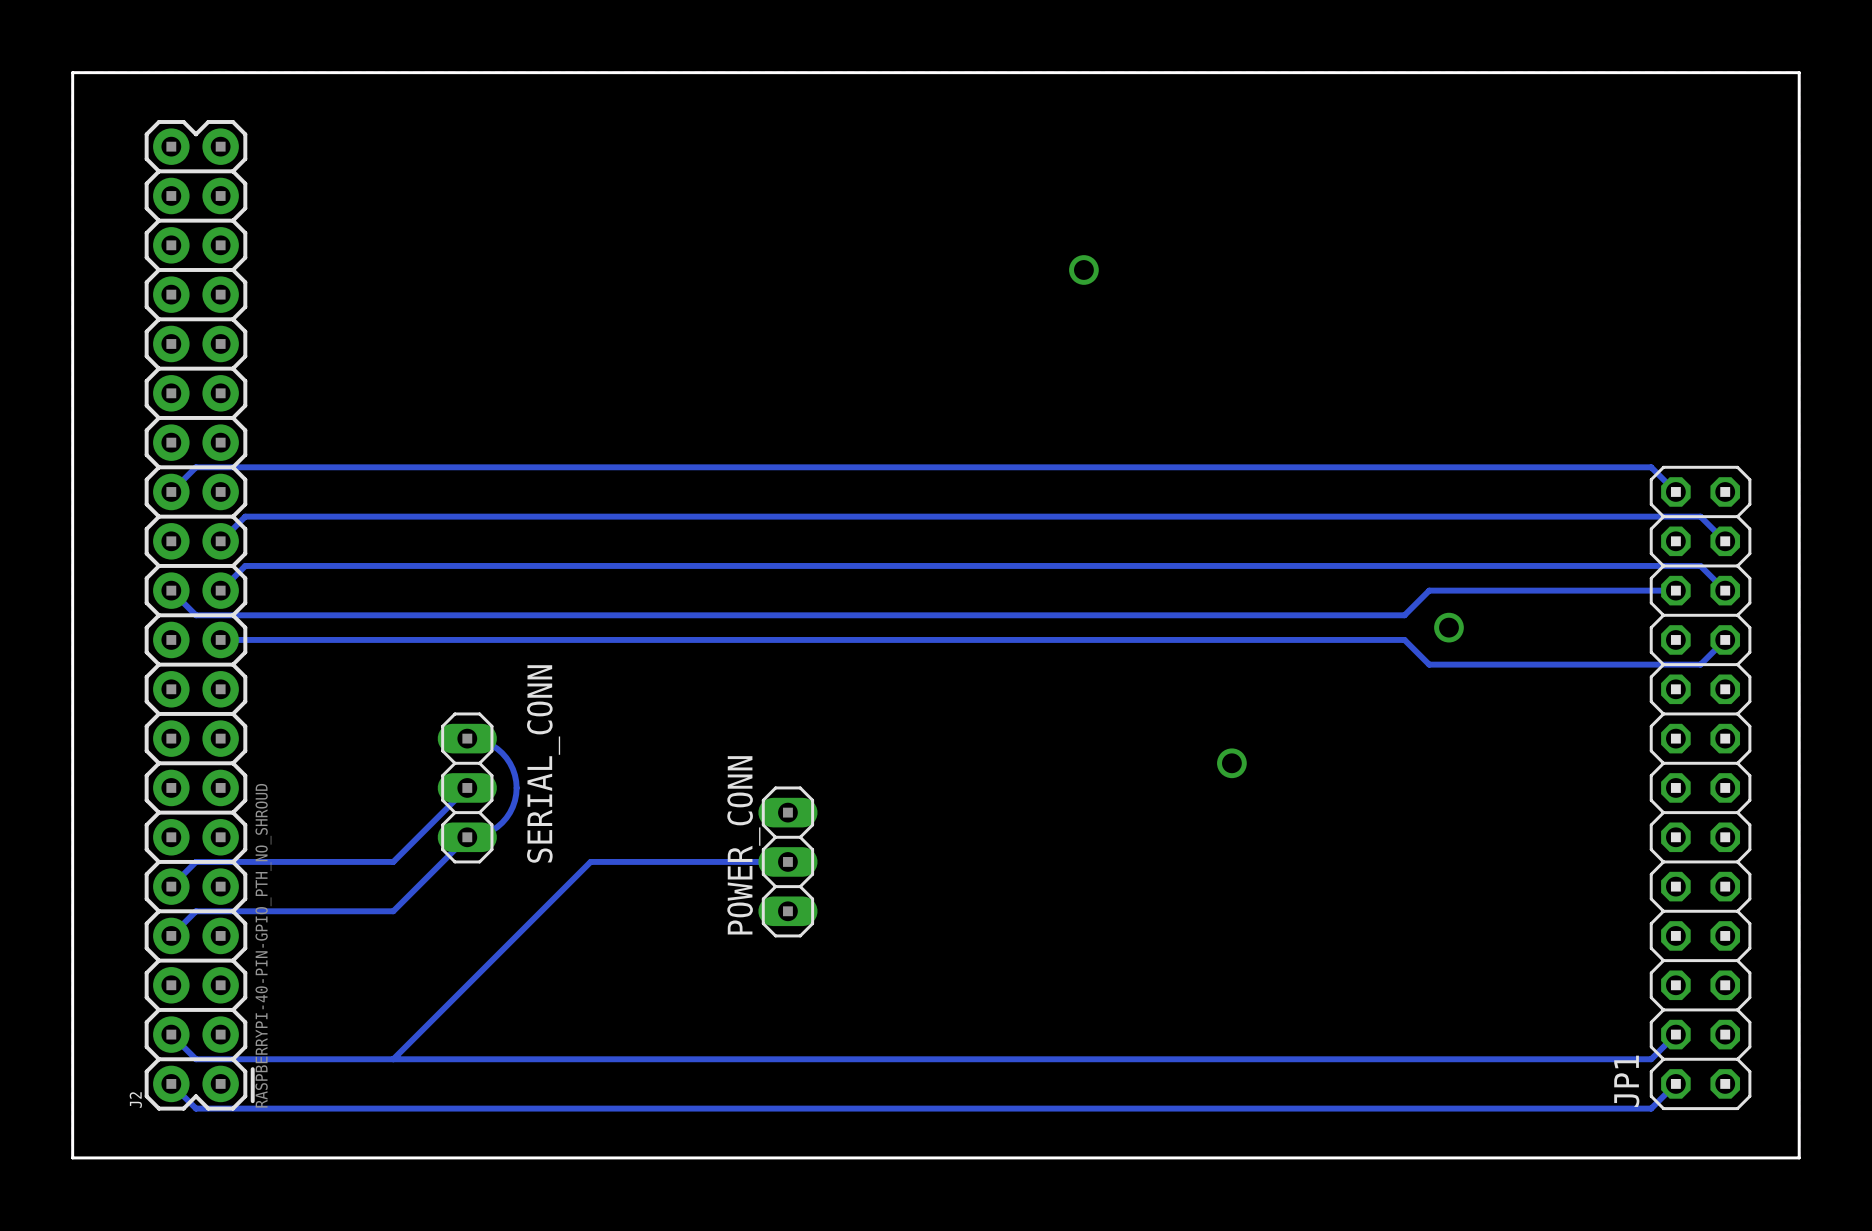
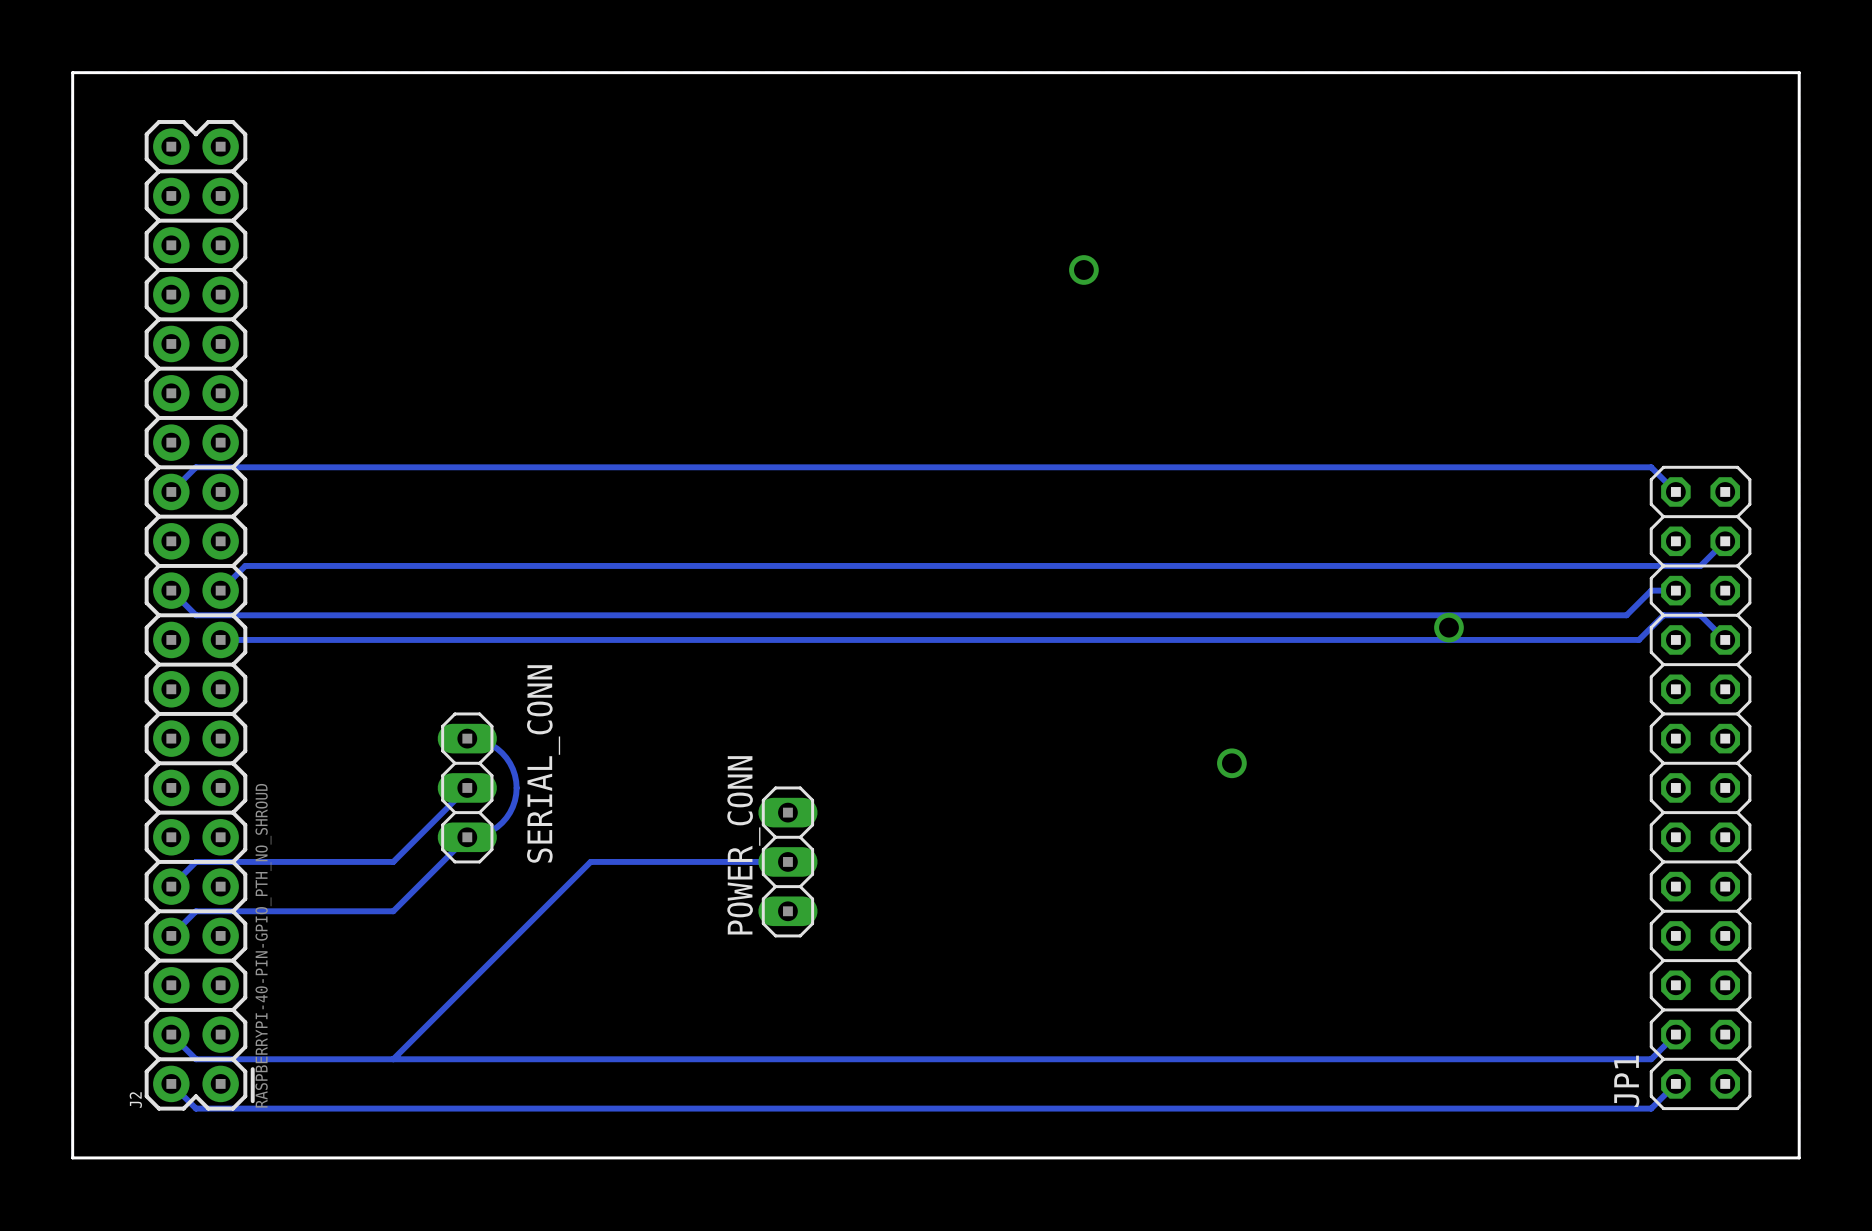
bottom track: (220, 541) (245, 516) (1700, 516) (1725, 541) -> none
bottom track: (1700, 565) (1725, 590) -> (1700, 565) (1725, 541)
bottom track: (1651, 590) (1429, 590) (1404, 615) -> (1651, 590) (1626, 615) (1404, 615)
bottom track: (1404, 639) (1429, 664) (1700, 664) (1725, 639) -> (1404, 639) (1638, 639) (1663, 615) (1700, 615) (1725, 639)

